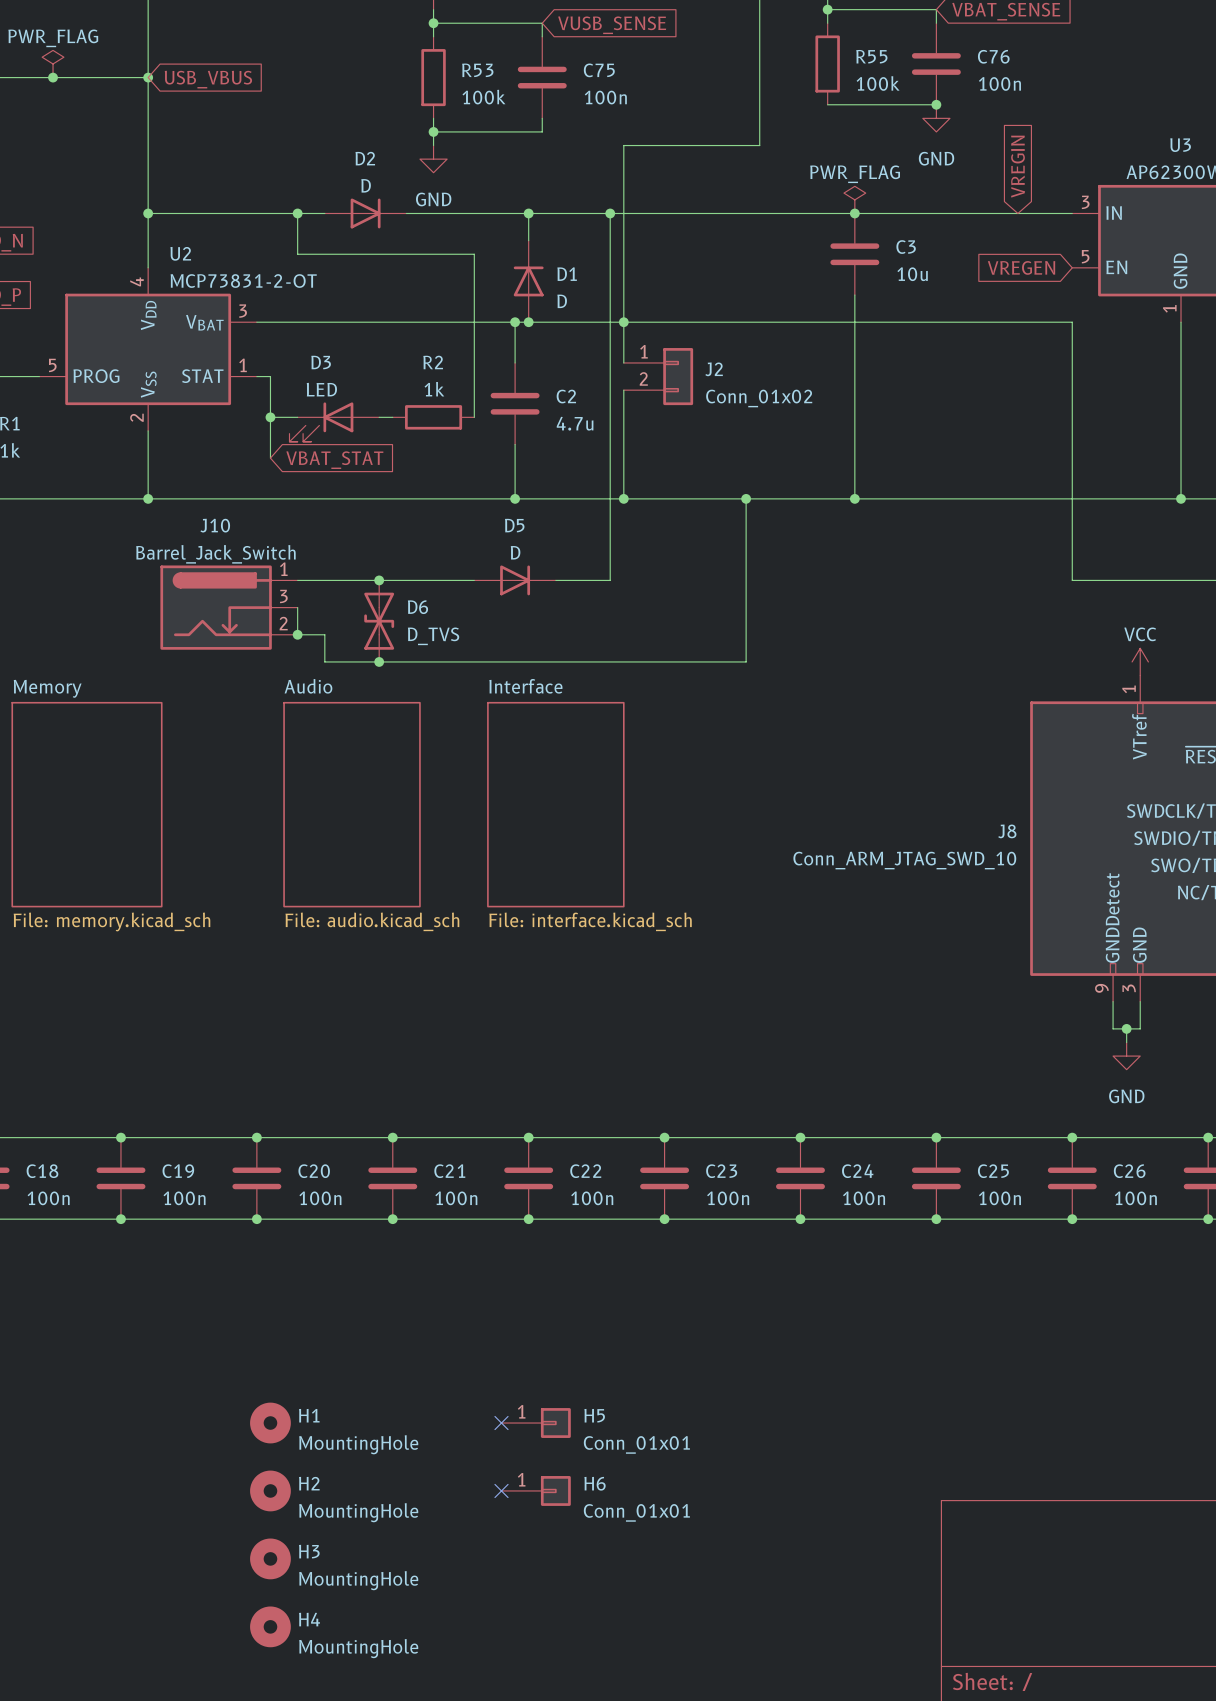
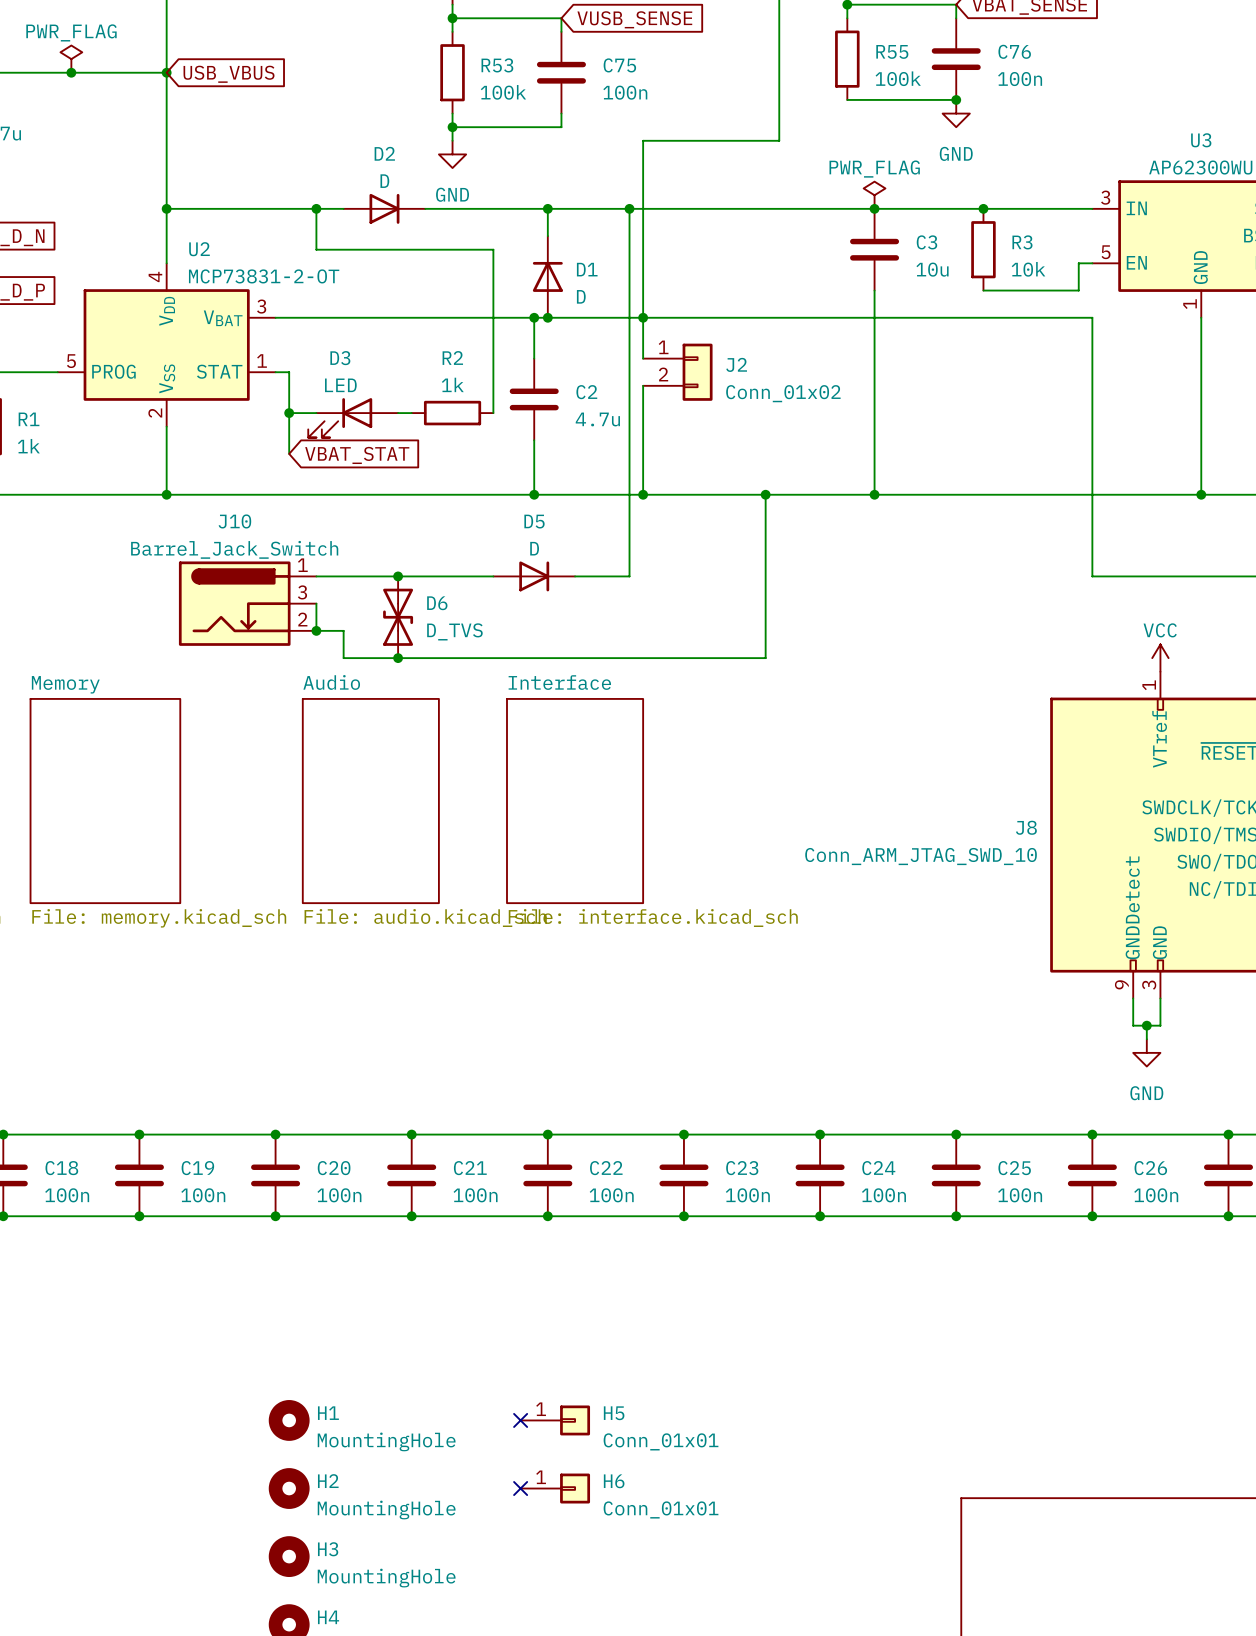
global label: VREGIN (1018, 166) -> none
junction: none -> (983, 208)
R3: none -> 10k (983, 249)
global label: VREGEN (1021, 267) -> none
wire: none -> (1092, 263) (1078, 263) (1078, 290) (983, 290)

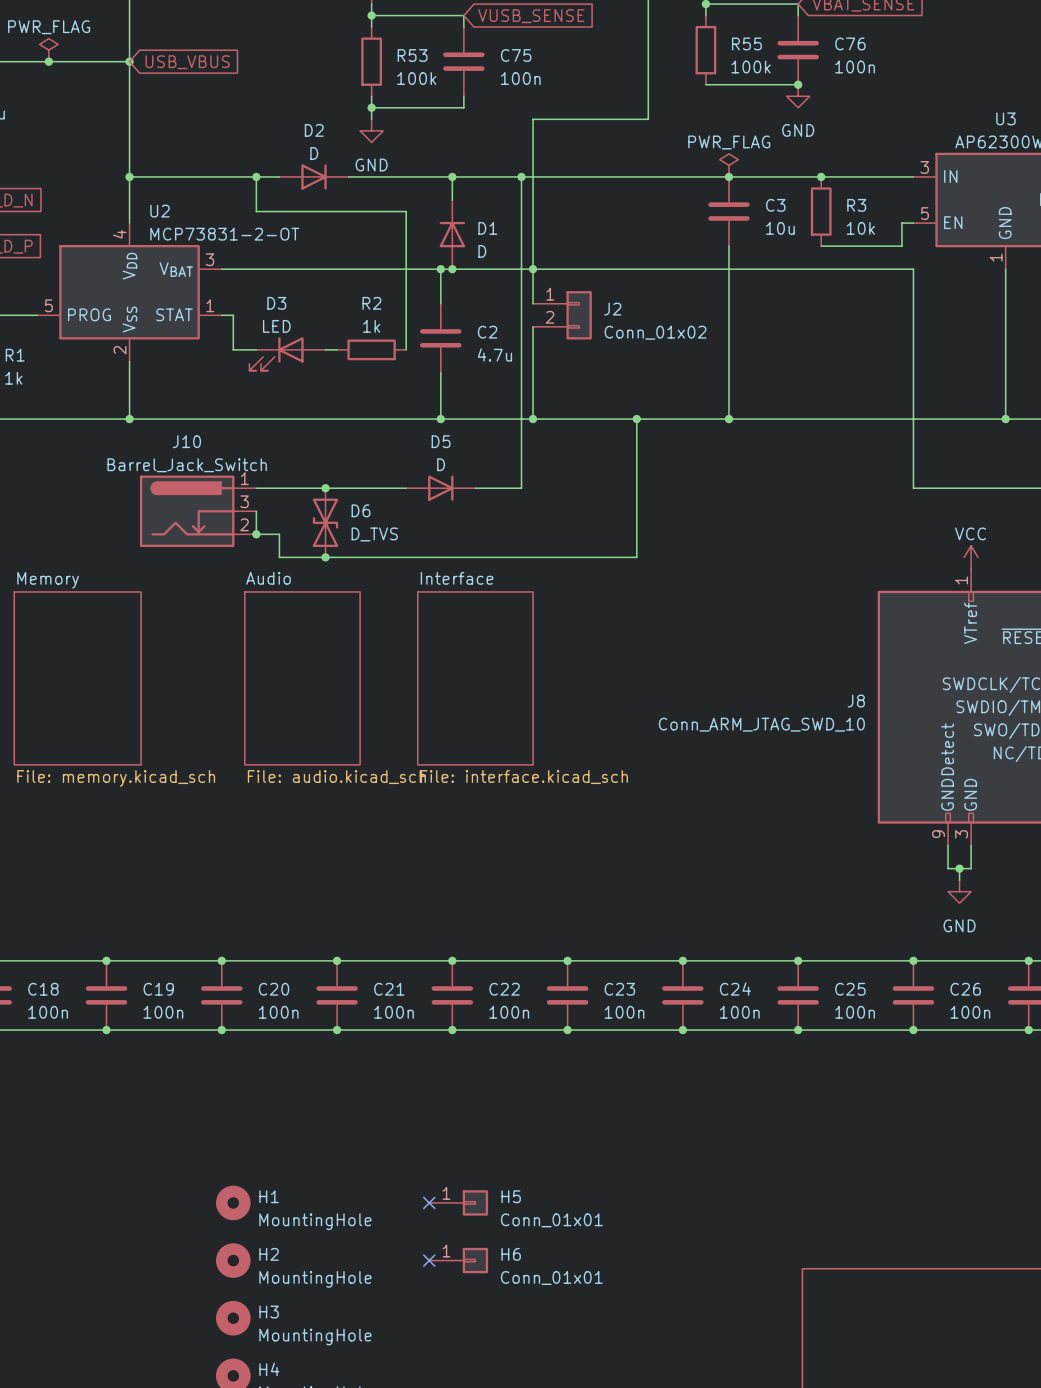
wire: (289, 413) (289, 453) -> none
junction: (289, 413) -> none
global label: VBAT_STAT (357, 455) -> none

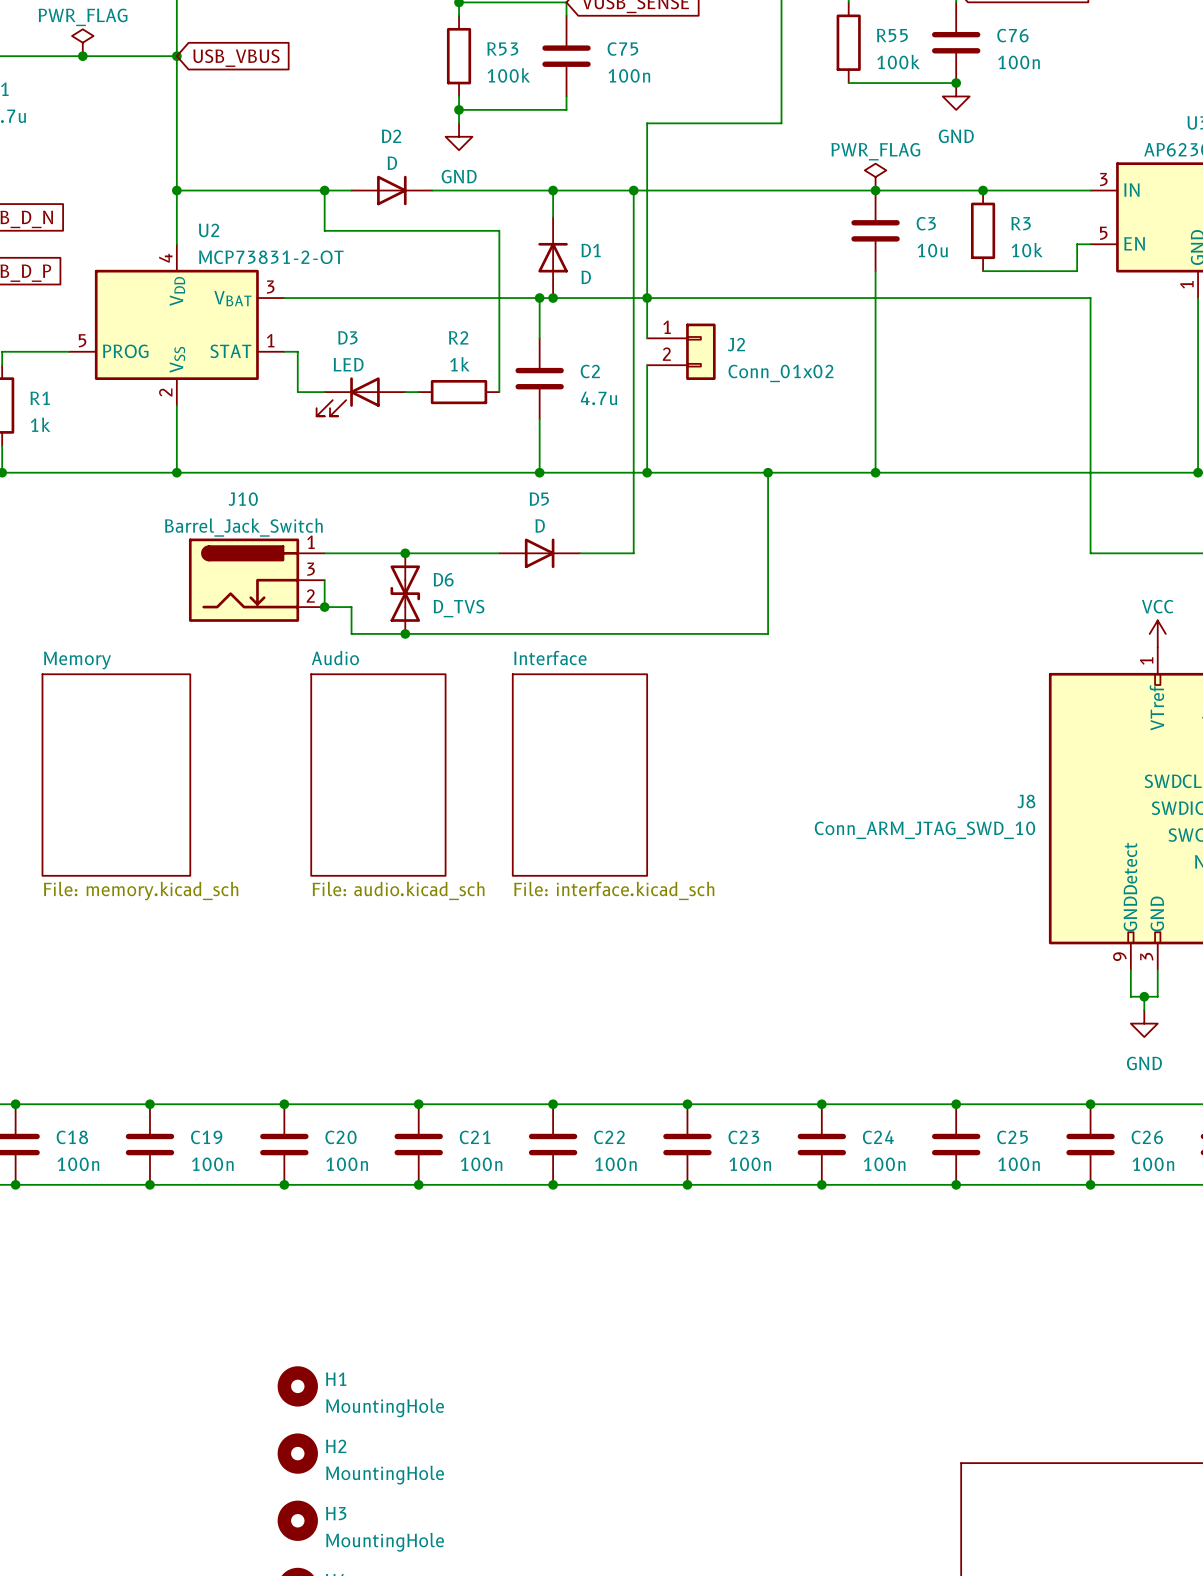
no-connect mark: (429, 1202) -> none
H5: Conn_01x01 (458, 1202) -> none
no-connect mark: (429, 1260) -> none
H6: Conn_01x01 (458, 1260) -> none

